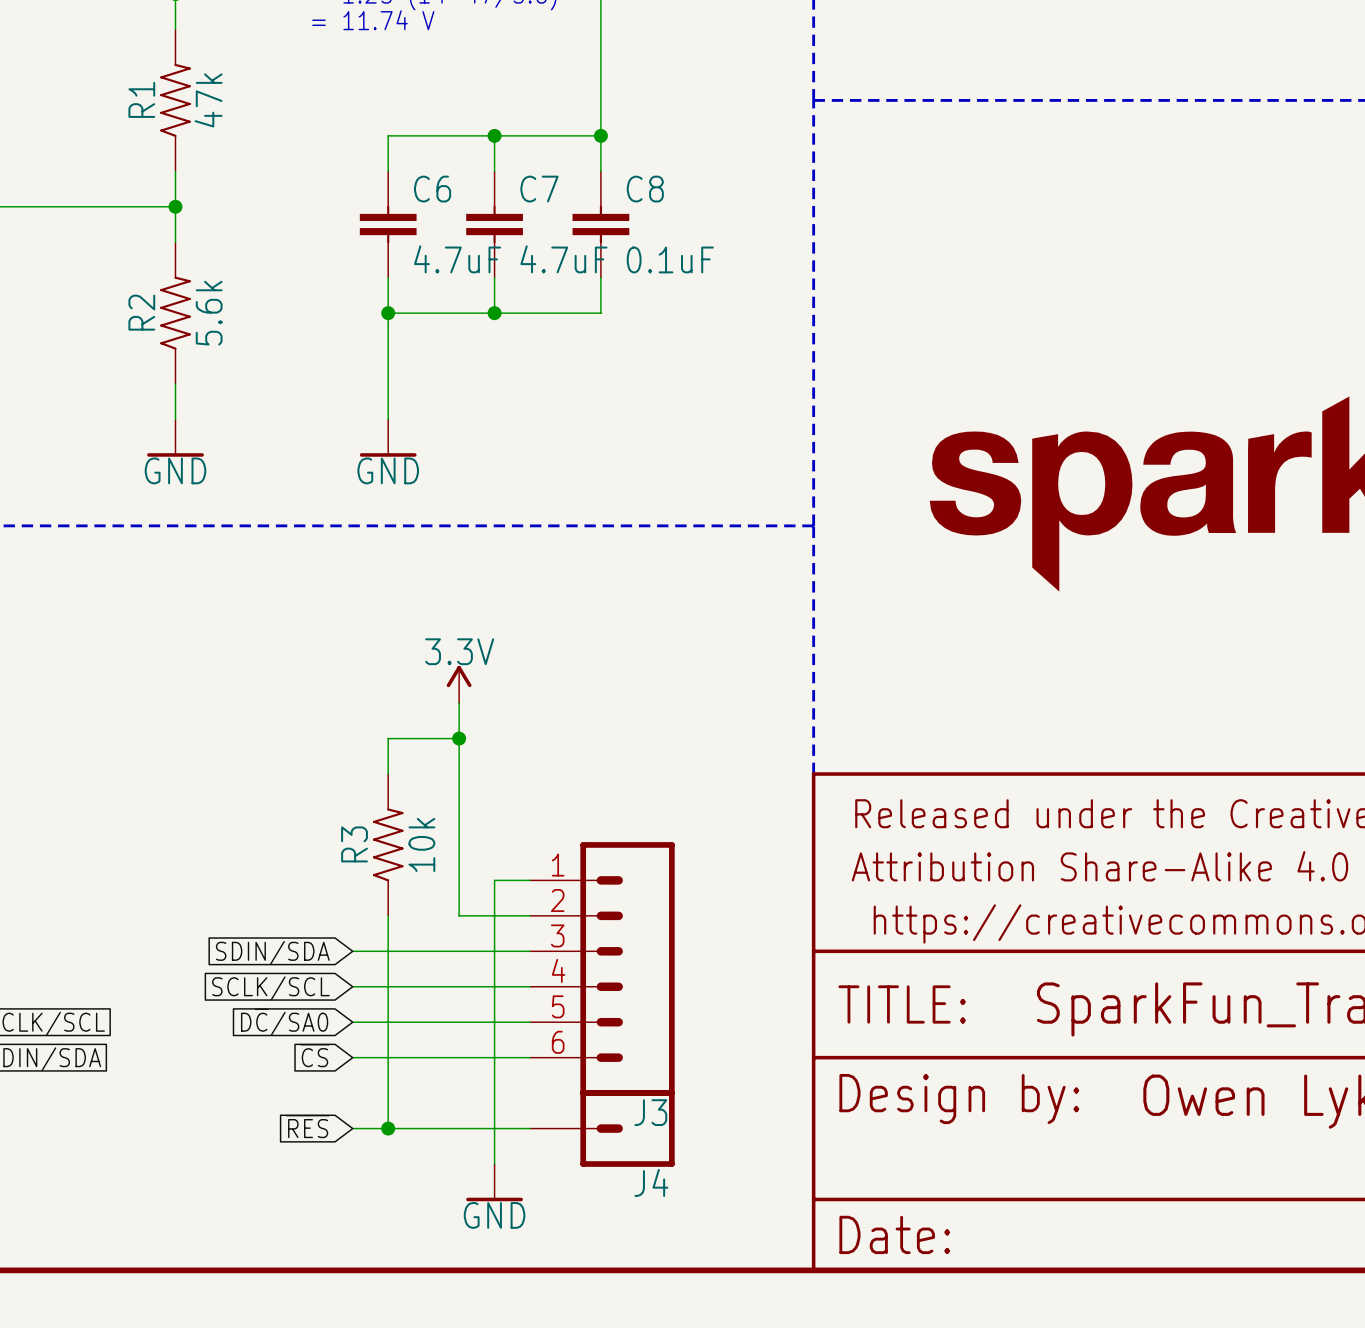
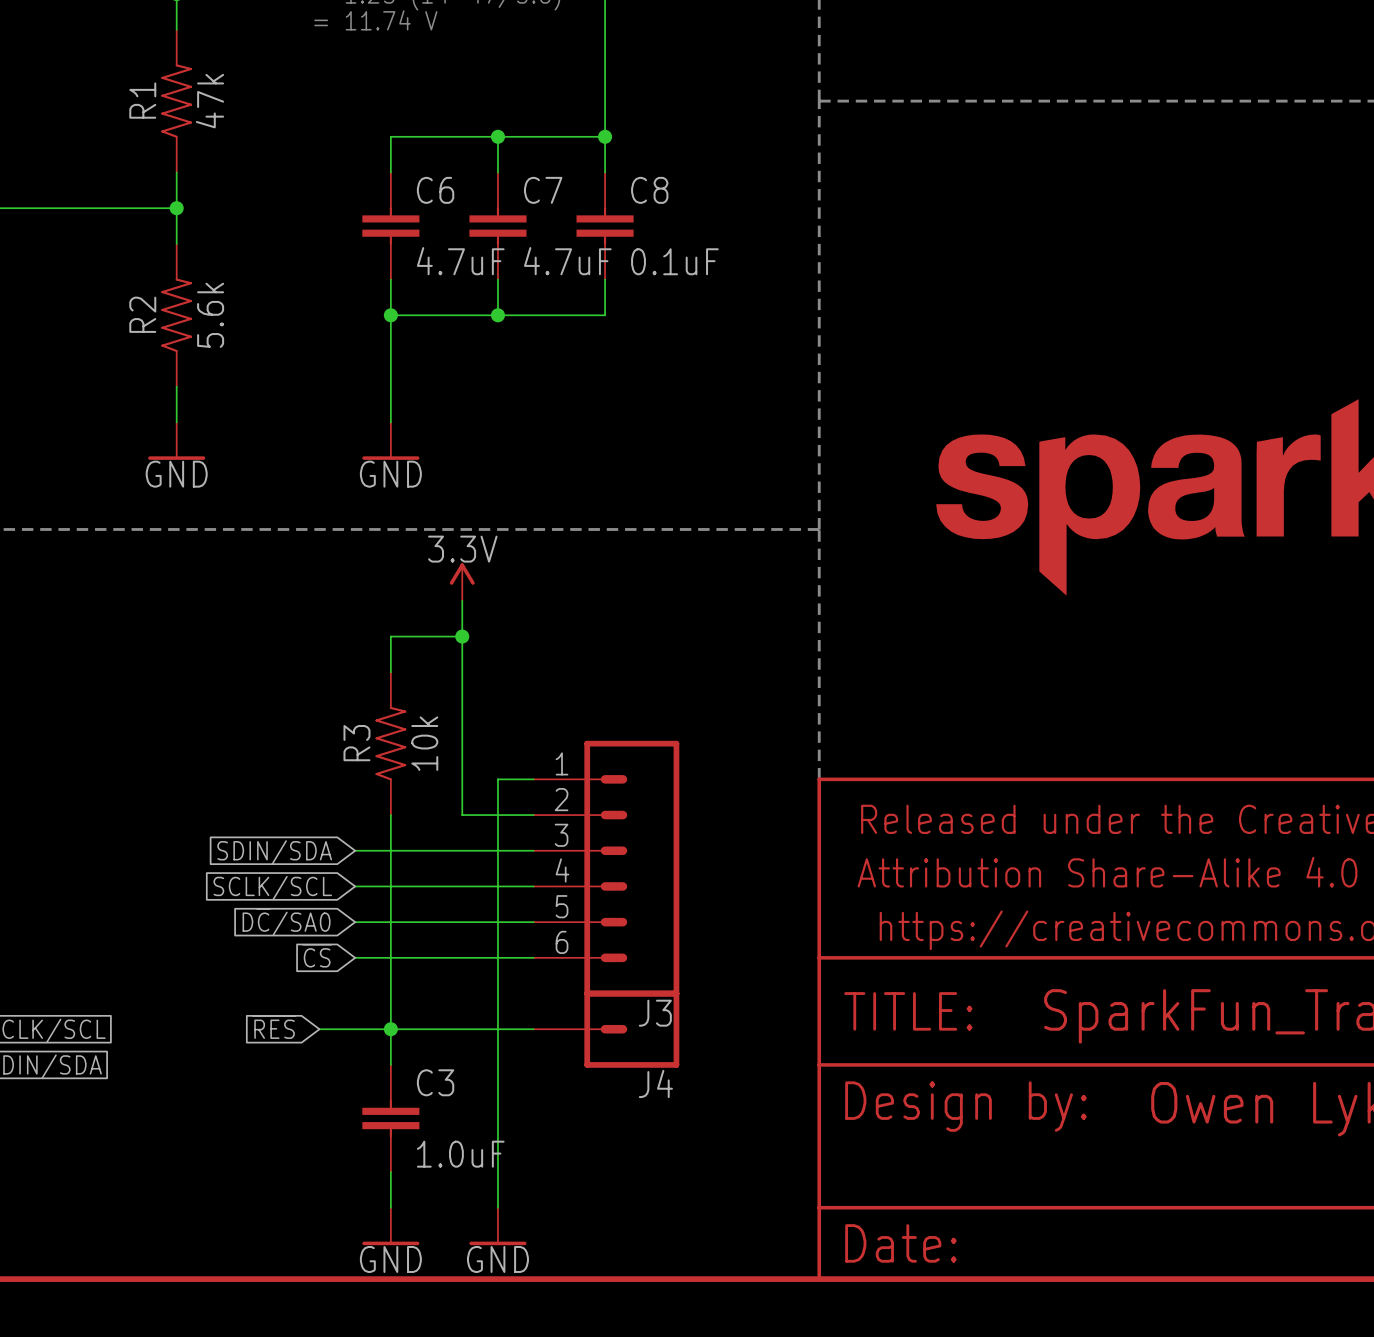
wire: none -> (462, 600) (462, 707)
junction: none -> (462, 636)
power symbol position: 3.3V (459, 684) -> 3.3V (462, 582)
wire: (459, 738) (388, 738) (388, 774) -> (462, 636) (390, 636) (390, 672)
junction: (459, 738) -> none
wire: none -> (533, 779) (497, 779) (497, 886) (355, 886)
wire: (459, 809) (459, 915) -> (462, 815) (533, 815)
R3 position: (388, 844) -> (390, 743)
global label: none -> SDIN/SDA (274, 852)
wire: none -> (355, 922) (462, 922)
global label: SDIN/SDA (272, 952) -> ~{CS} (317, 955)
J3 position: (602, 969) -> (606, 868)
wire: (352, 986) (530, 986) -> none
global label position: SCLK/SCL (270, 988) -> SCLK/SCL (272, 888)
global label position: D~{C}/SA0 (284, 1022) -> D~{C}/SA0 (286, 922)
wire: none -> (319, 1029) (355, 1029)
junction: none -> (390, 1029)
global label: ~{CS} (314, 1055) -> none
wire: (352, 1057) (530, 1057) -> (355, 850) (533, 850)
C3: none -> 1.0uF (390, 1118)
global label position: ~{RES} (307, 1126) -> ~{RES} (274, 1027)
wire: (352, 1128) (530, 1128) -> none
junction: (388, 1128) -> none
J4 position: (602, 1128) -> (606, 1029)
wire: none -> (390, 1172) (390, 1207)
power symbol position: GND (494, 1182) -> GND (497, 1226)
power symbol: none -> GND (390, 1226)

